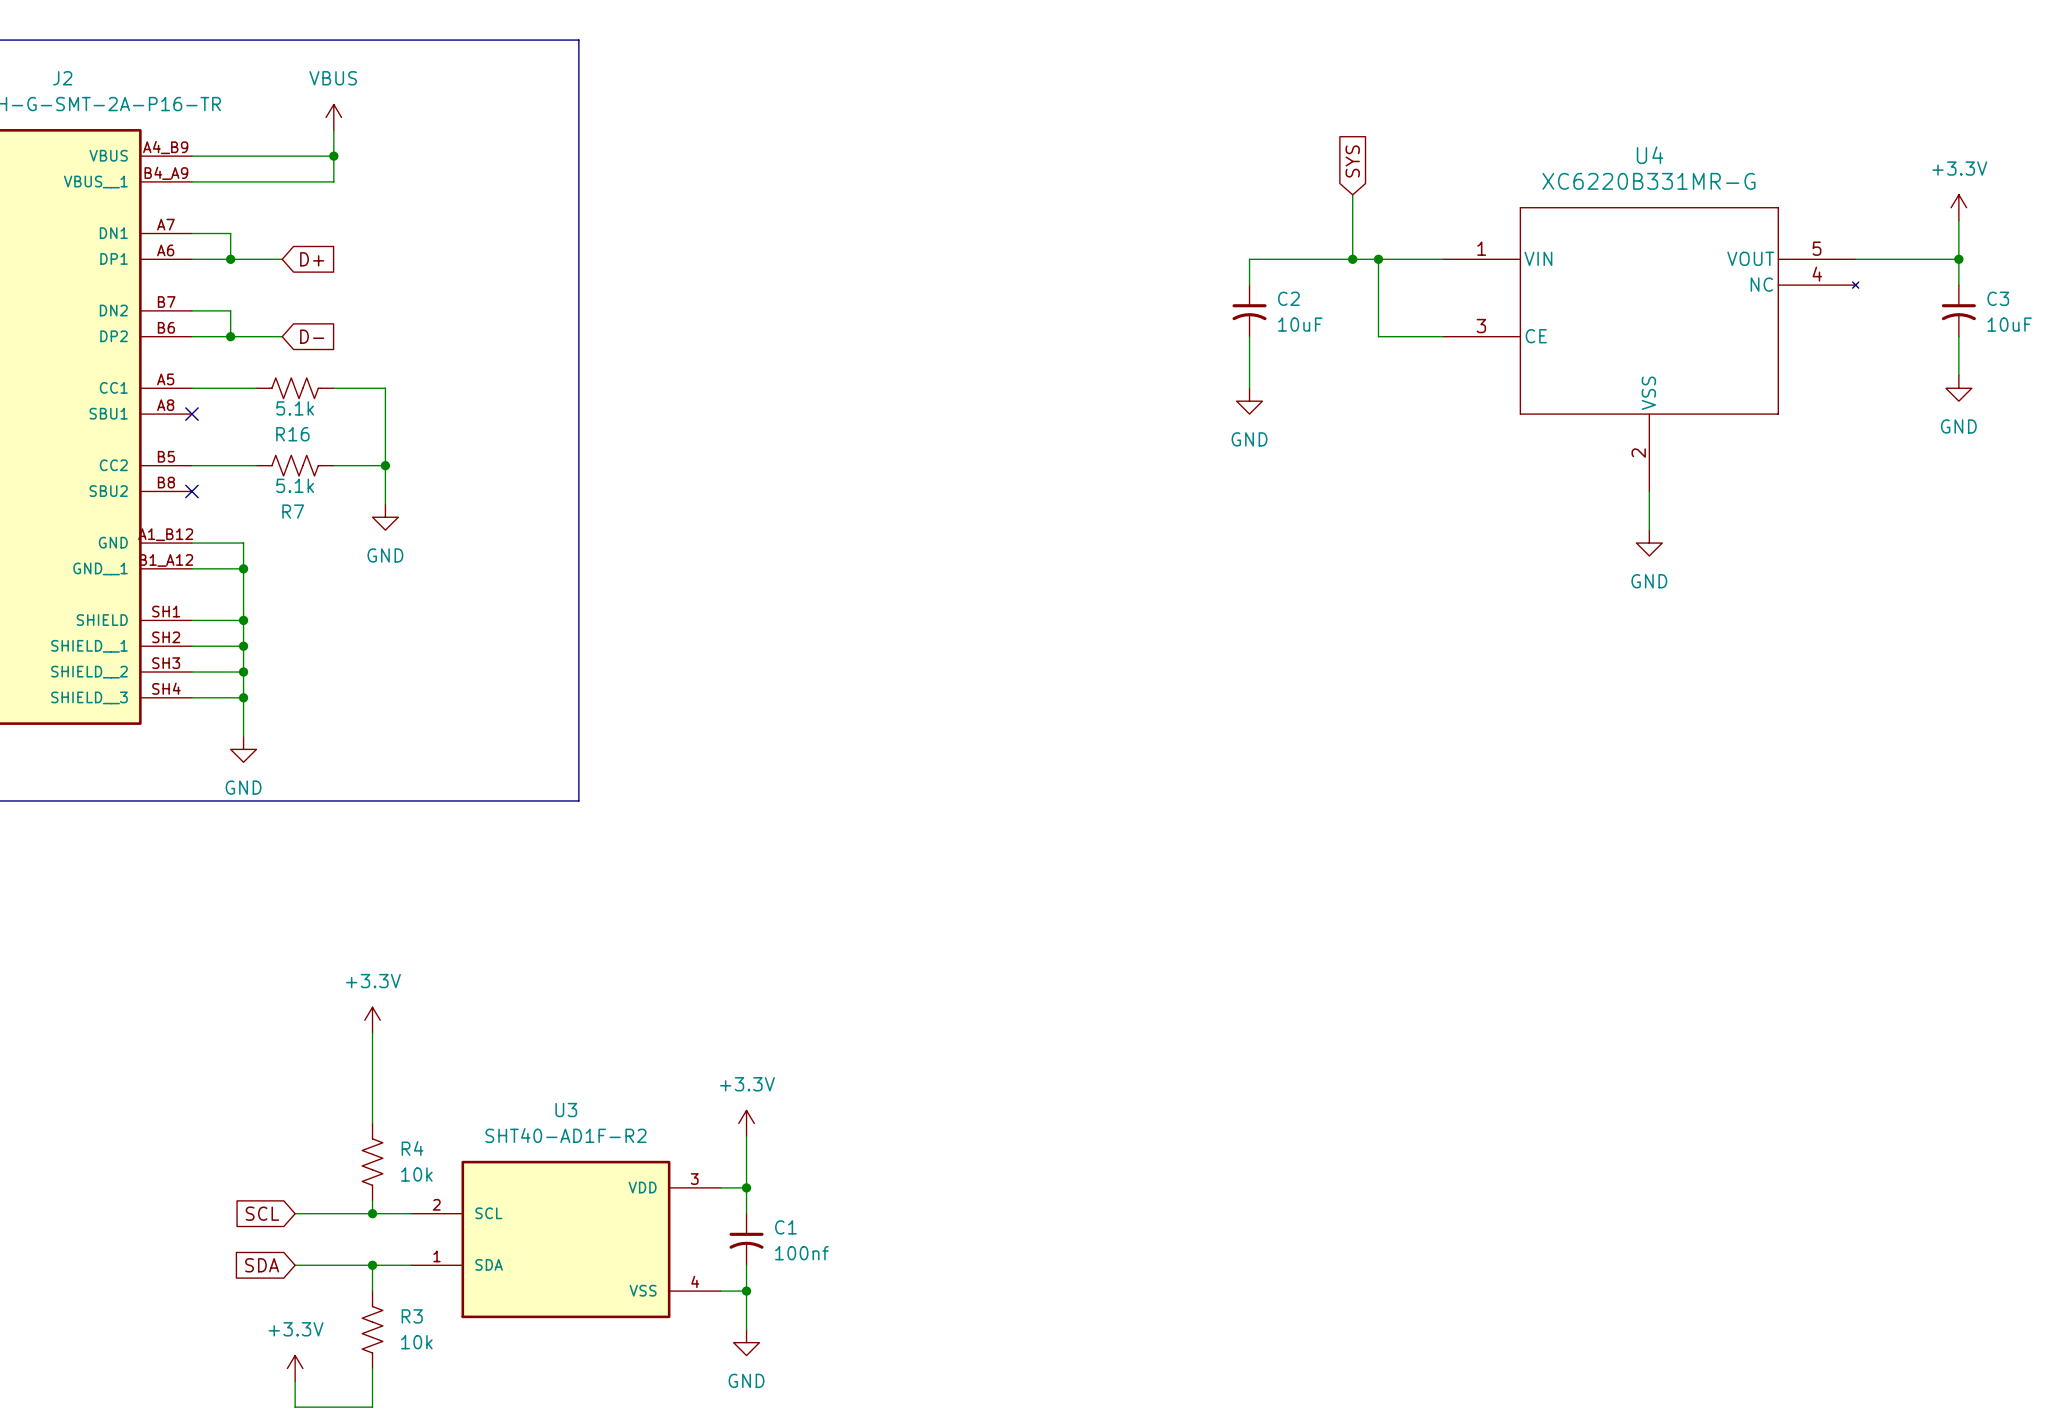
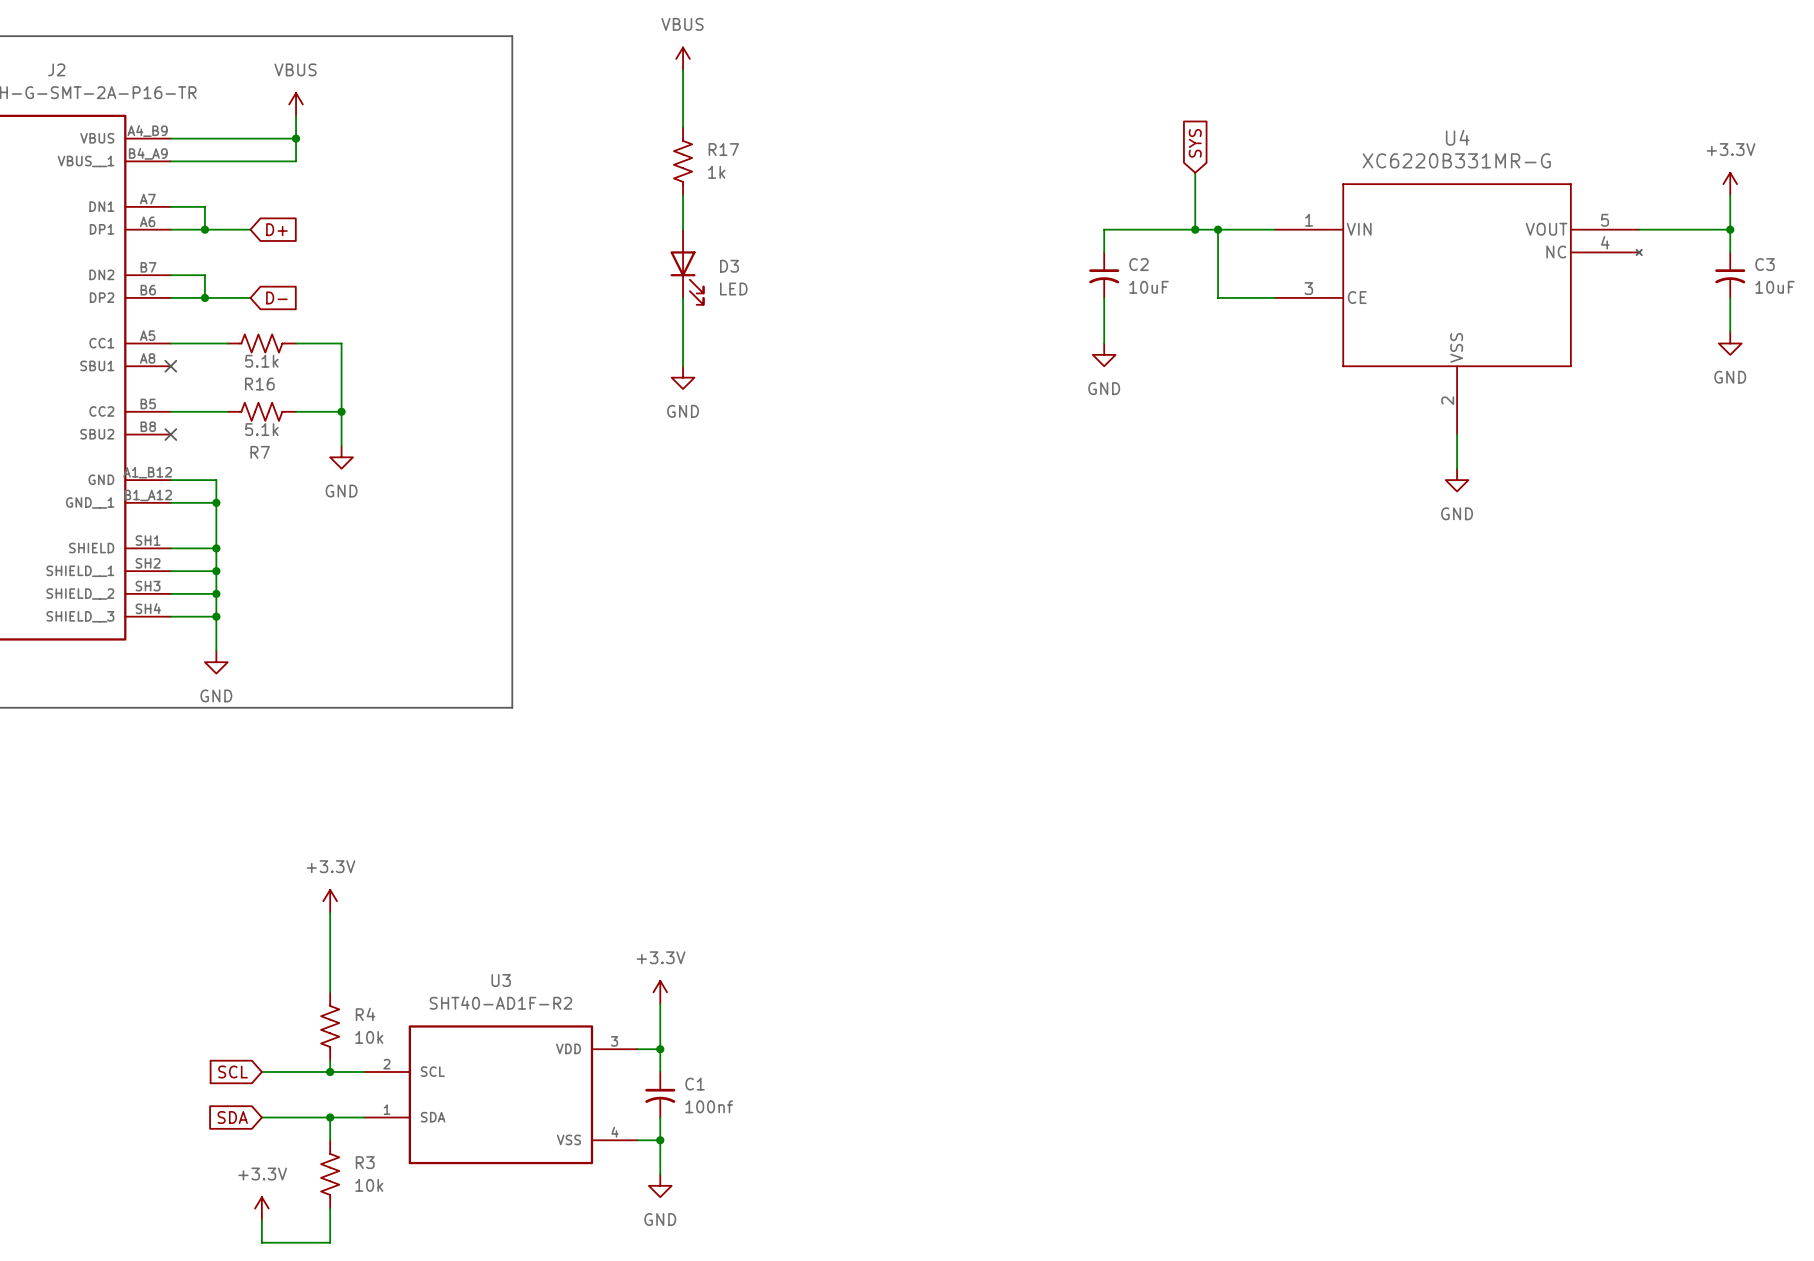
power symbol: none -> VBUS (683, 58)
wire: none -> (683, 70) (683, 127)
R17: none -> 1k (683, 161)
wire: none -> (683, 195) (683, 229)
D3: none -> LED (687, 267)
wire: none -> (683, 297) (683, 366)
power symbol: none -> GND (683, 377)

